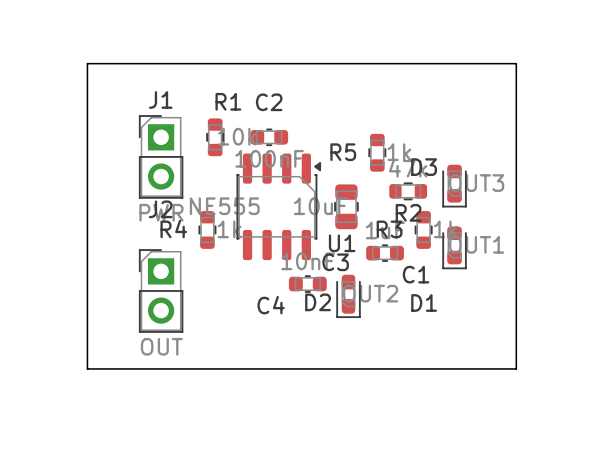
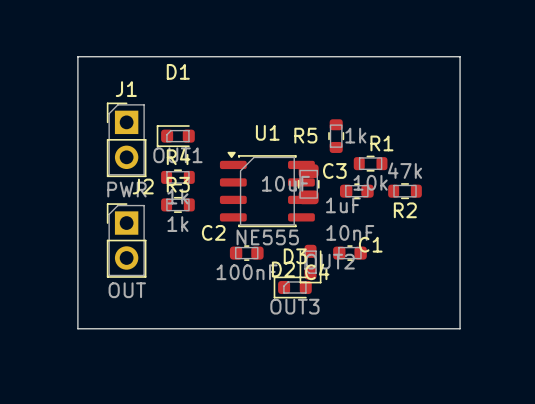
C2 name position: C2 (269, 102) -> C2 (213, 232)
R1 rotation: 0° (215, 137) -> 90° clockwise (370, 163)
R1 position: (215, 137) -> (370, 163)
C2 position: (269, 137) -> (246, 253)
J1 position: (161, 156) -> (126, 139)
D3 rotation: 0° (454, 186) -> 90° clockwise (292, 287)
D3 position: (454, 186) -> (292, 287)
R2 position: (408, 191) -> (405, 191)
U1 rotation: 0° (278, 206) -> 90° counterclockwise (267, 189)
R4 rotation: 0° (207, 229) -> 90° clockwise (177, 177)
R4 position: (207, 229) -> (177, 177)
R3 rotation: 0° (423, 229) -> 90° clockwise (177, 204)
R3 position: (423, 229) -> (177, 204)
U1 name position: U1 (342, 243) -> U1 (267, 132)
D1 rotation: 0° (454, 247) -> 90° clockwise (175, 136)
D1 position: (454, 247) -> (175, 136)
C3 position: (385, 253) -> (356, 191)
C3 name position: C3 (335, 262) -> C3 (334, 170)
C4 position: (307, 284) -> (349, 253)
J2 position: (161, 290) -> (126, 240)
D1 name position: D1 (424, 303) -> D1 (178, 71)

